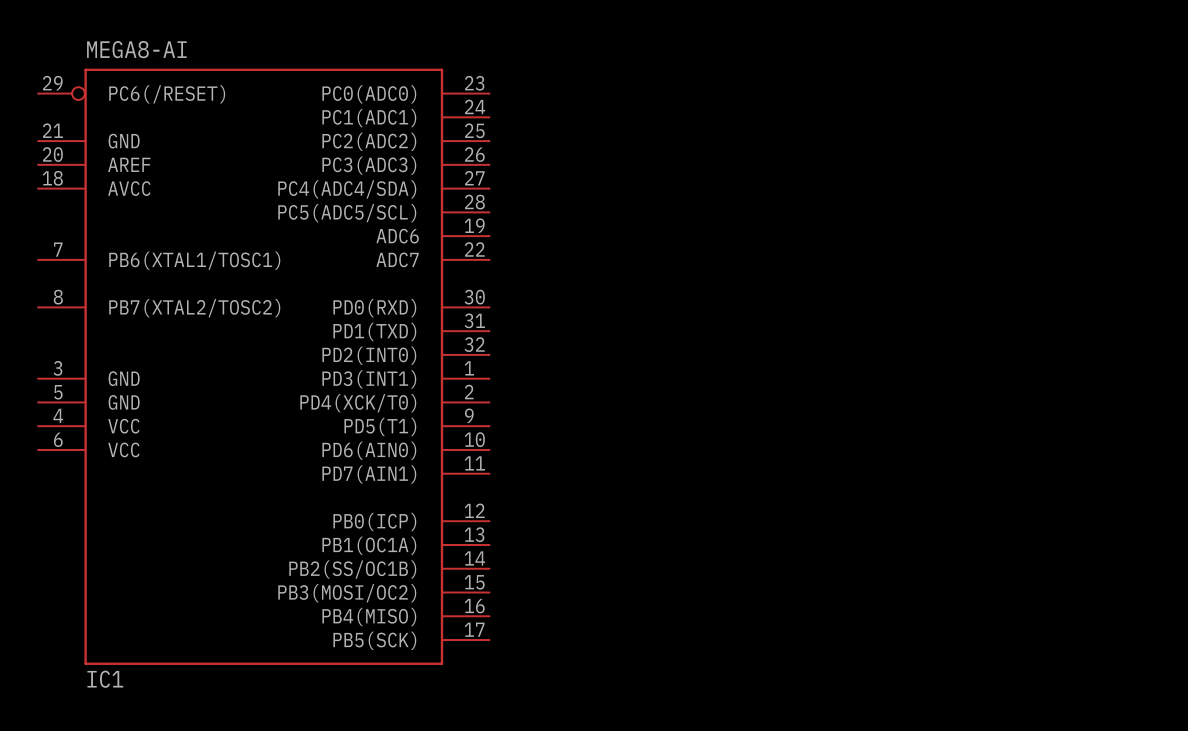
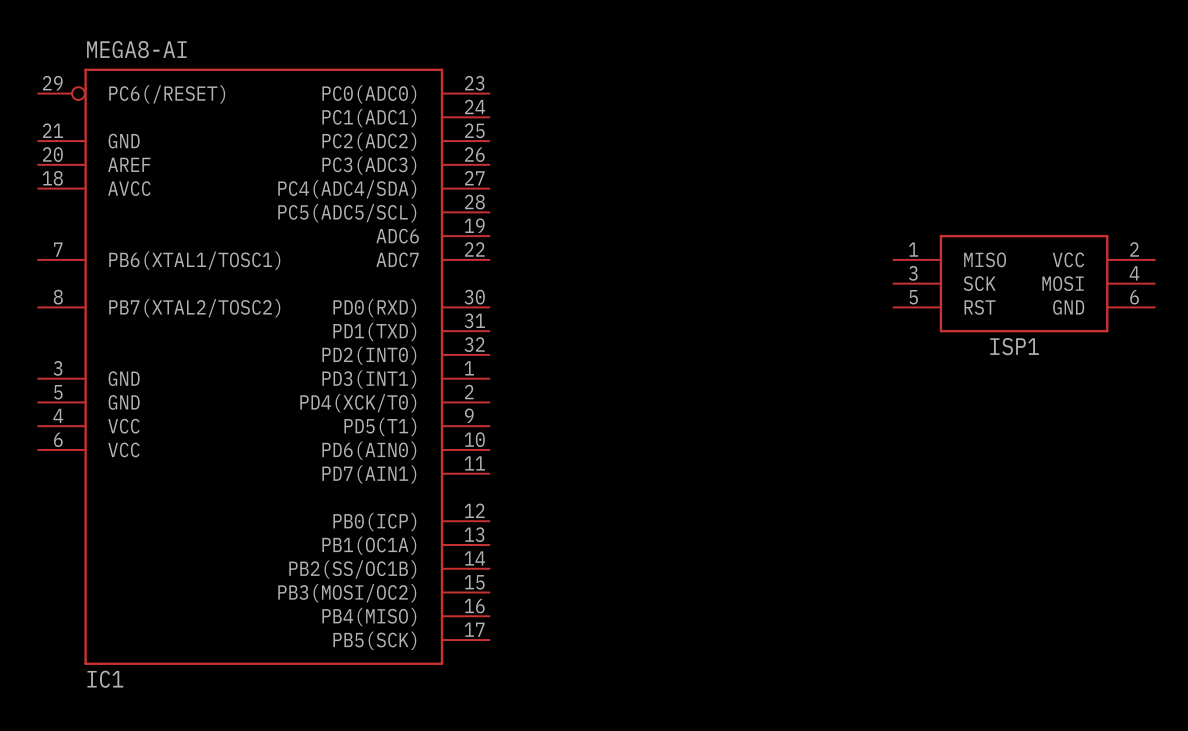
ISP1: none -> (1024, 283)

